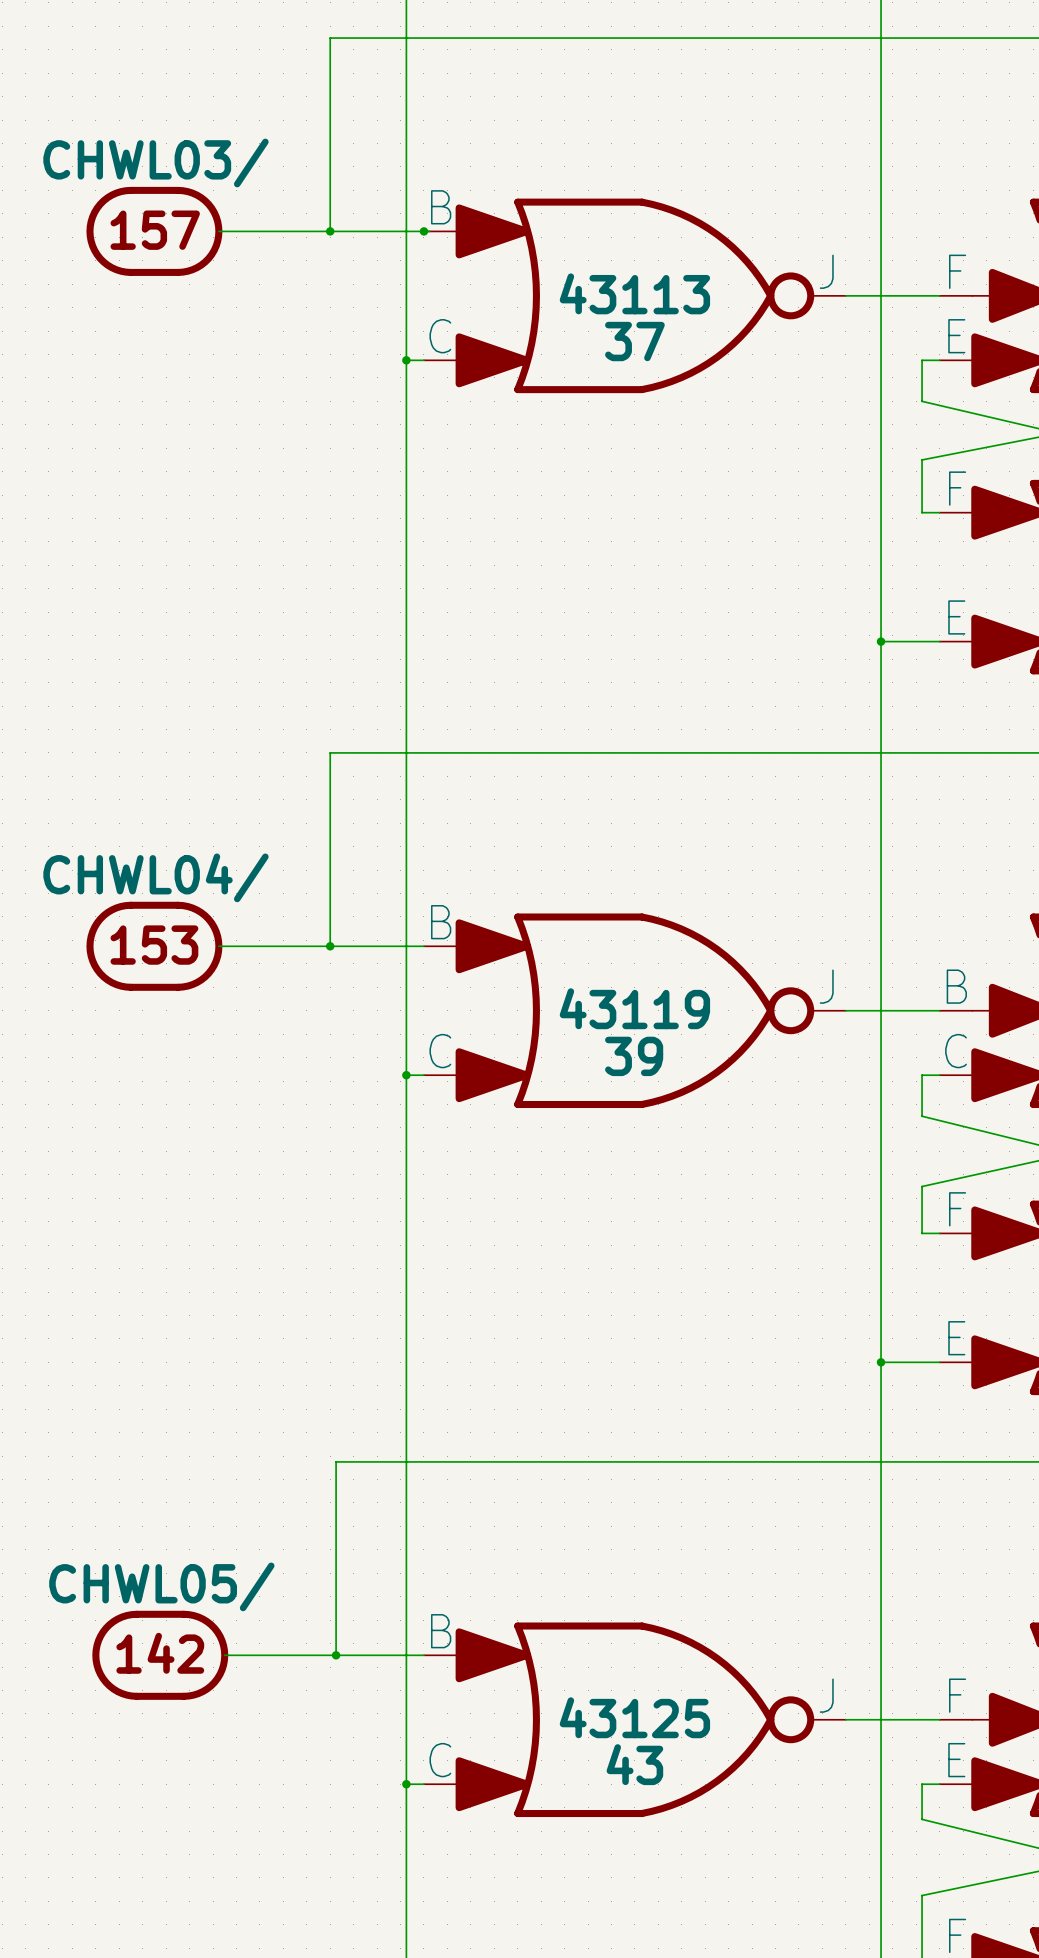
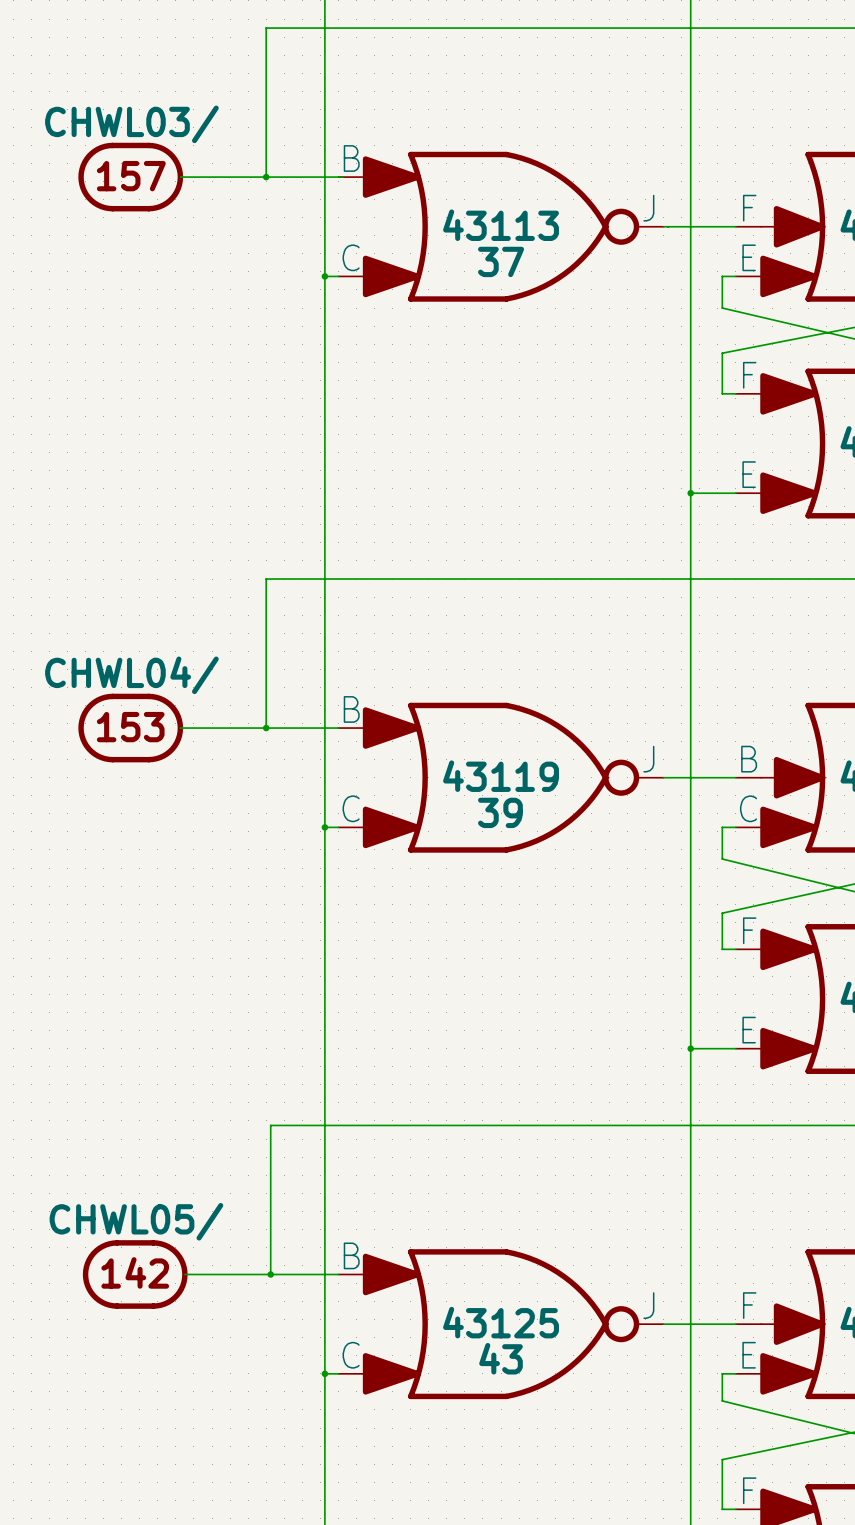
junction: (423, 231) -> none

